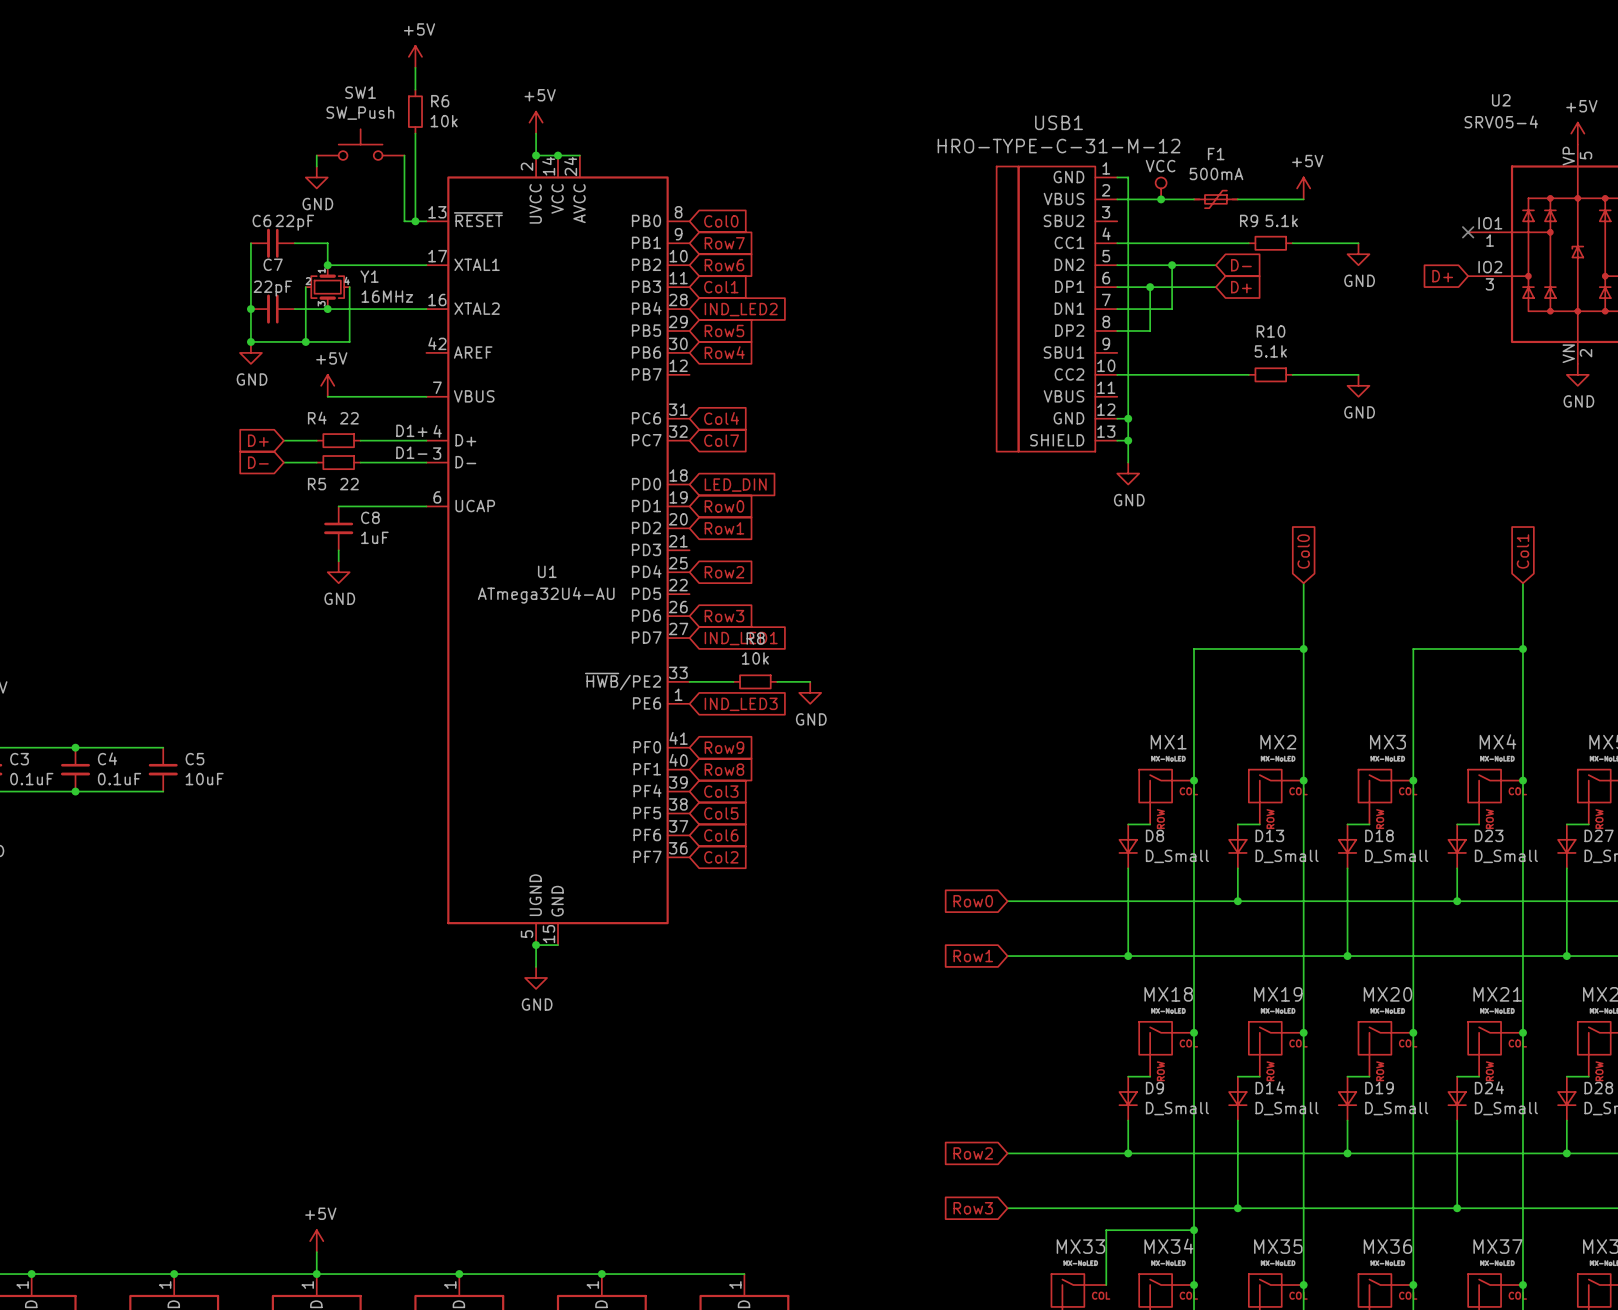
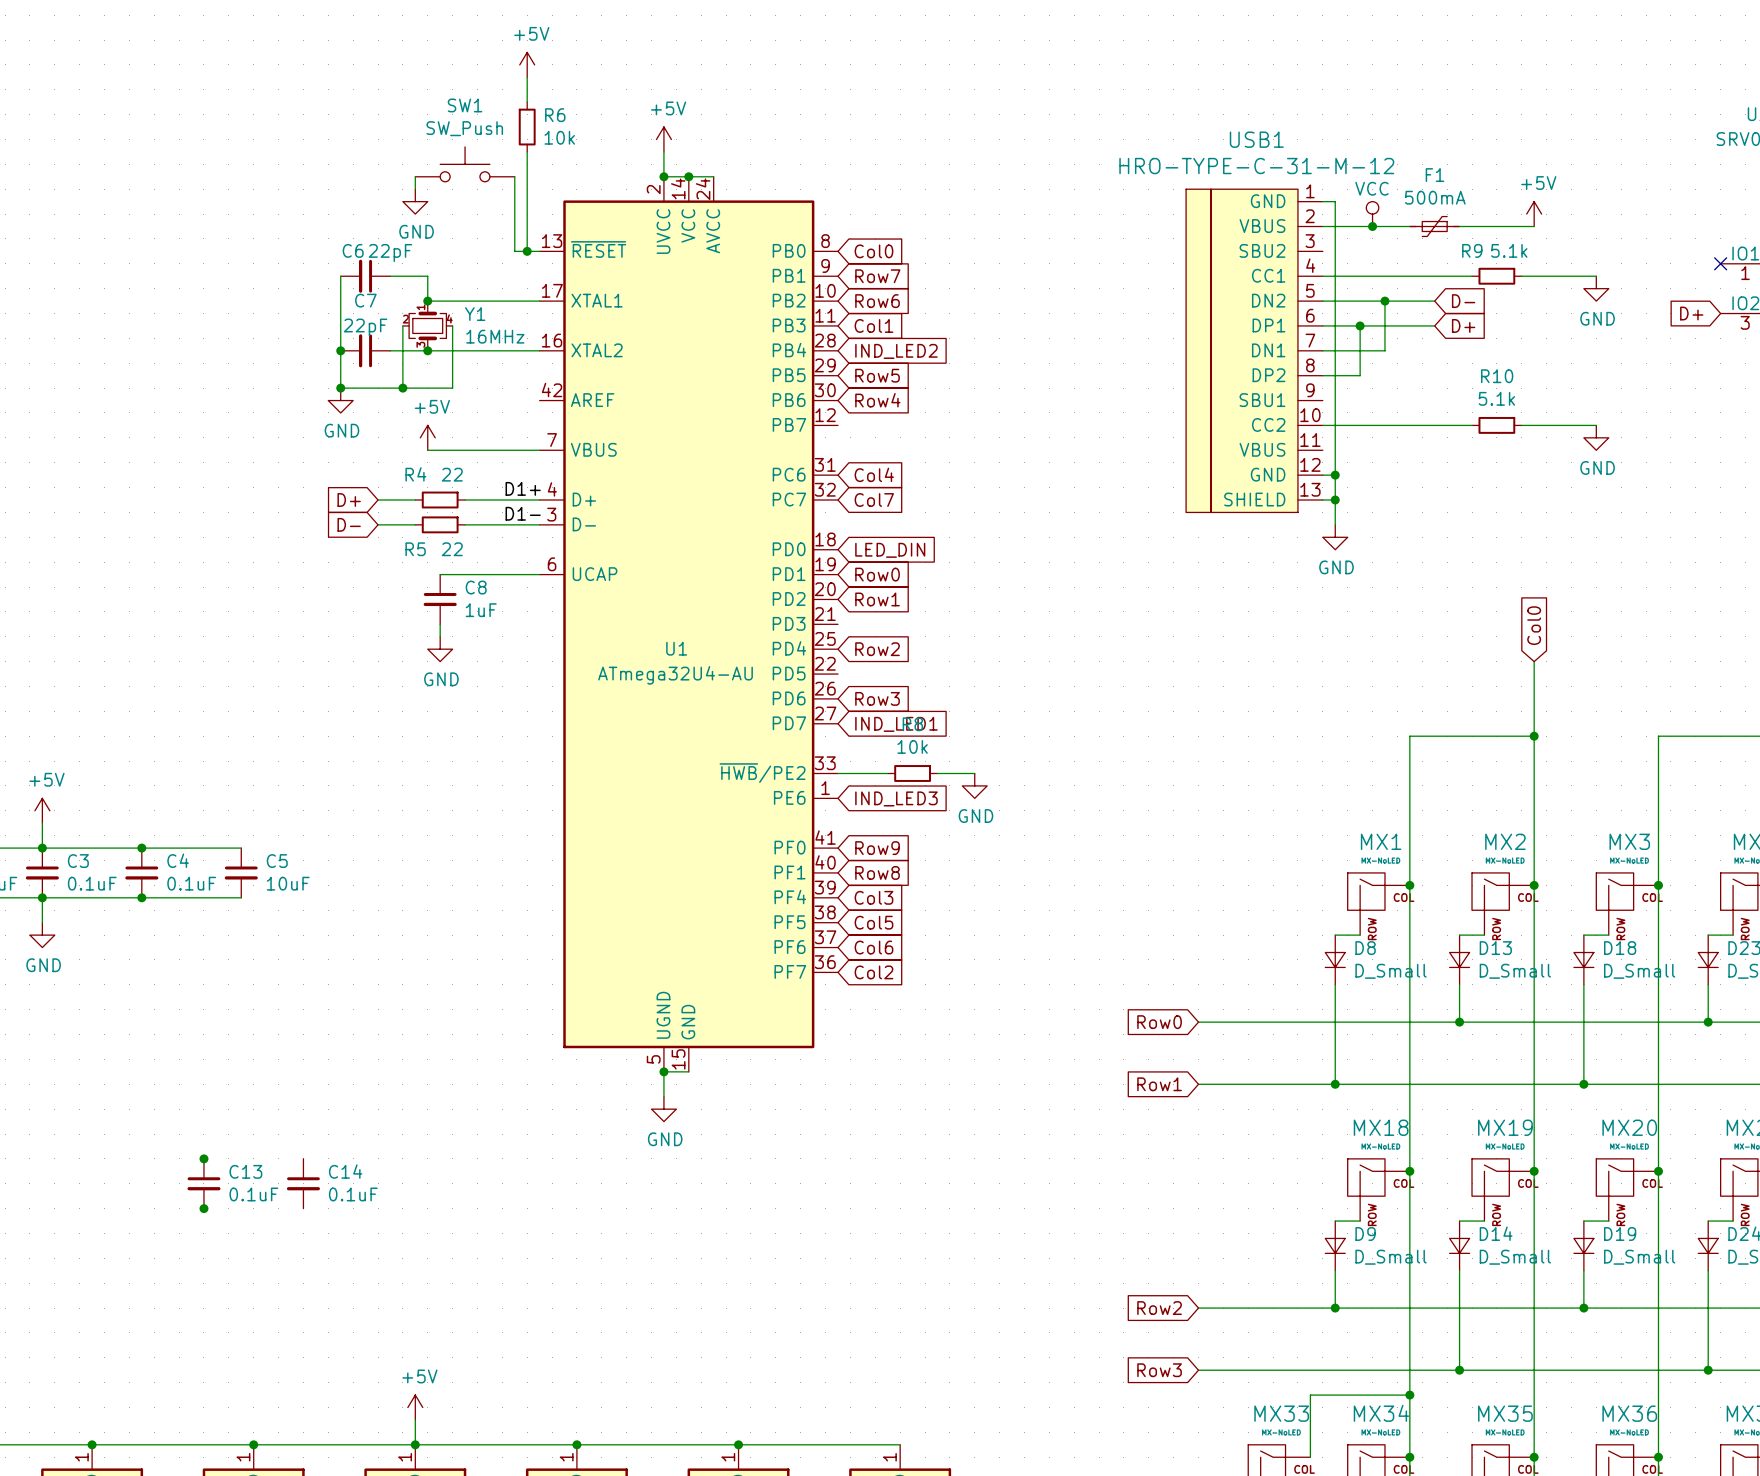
junction: none -> (203, 1158)
C13: none -> 0.1uF (203, 1183)
C14: none -> 0.1uF (303, 1183)
junction: none -> (203, 1208)

